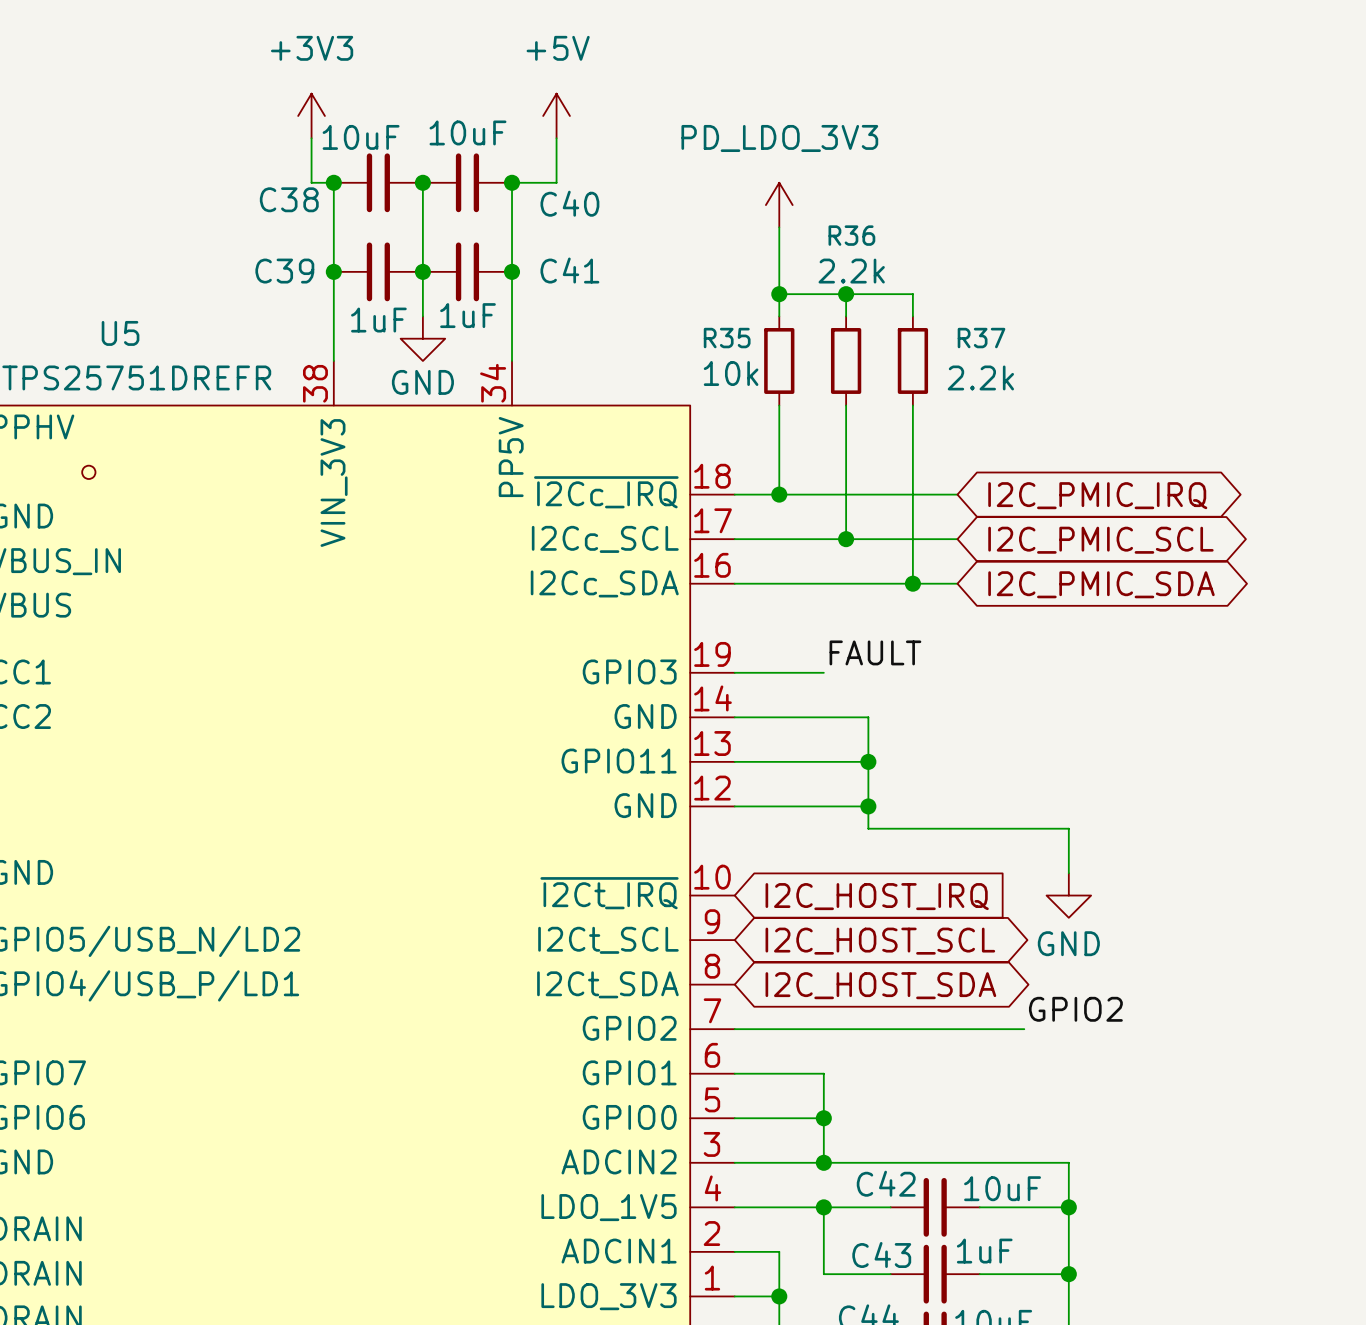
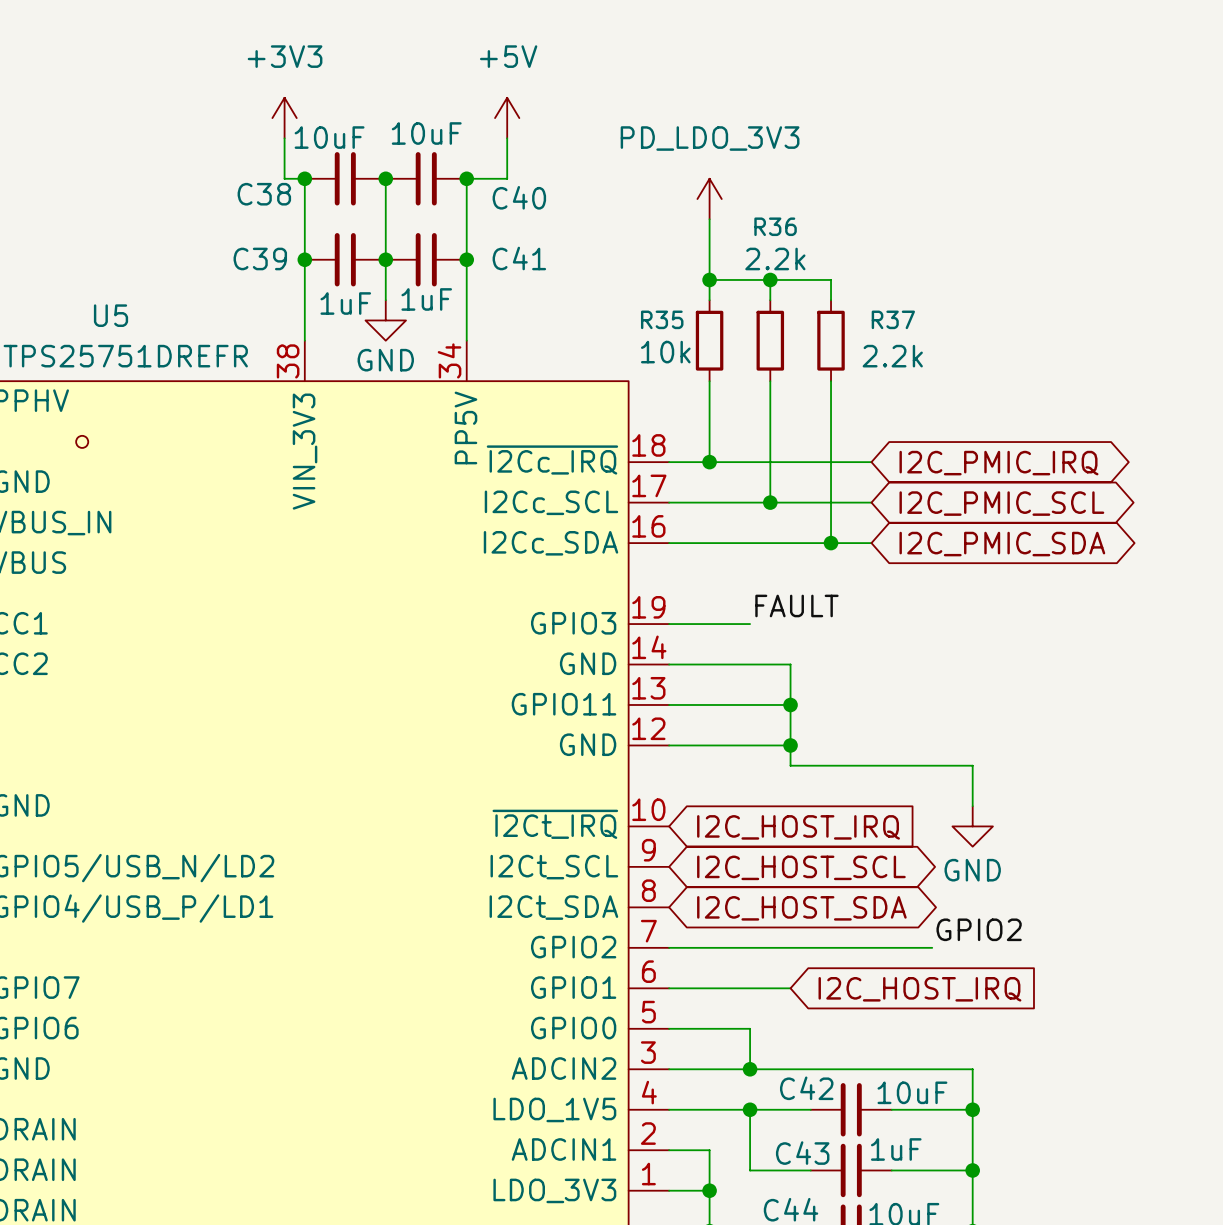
wire: (823, 1073) (823, 1118) -> (750, 988) (790, 988)
global label: none -> I2C_HOST_IRQ (919, 989)
junction: (823, 1118) -> none

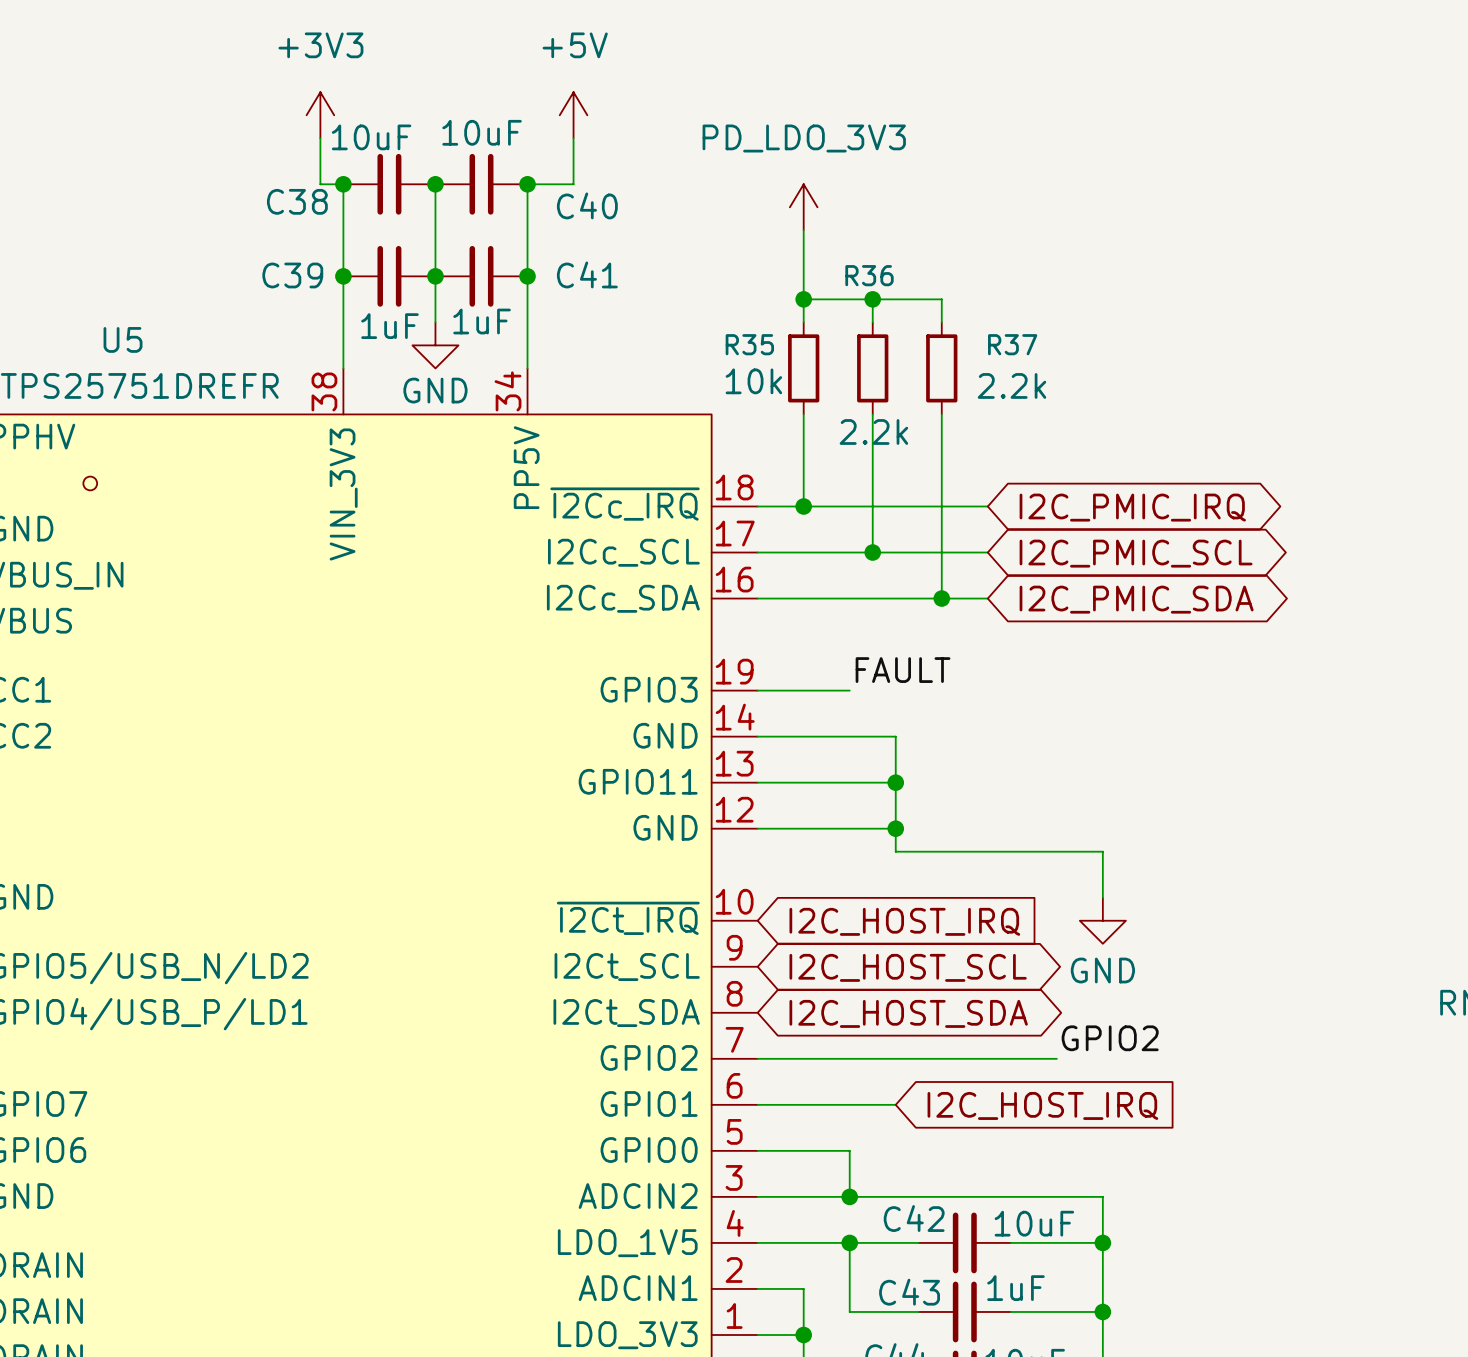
R36 name position: R36 (775, 226) -> R36 (869, 275)
R36 value position: 2.2k (775, 258) -> 2.2k (873, 431)

